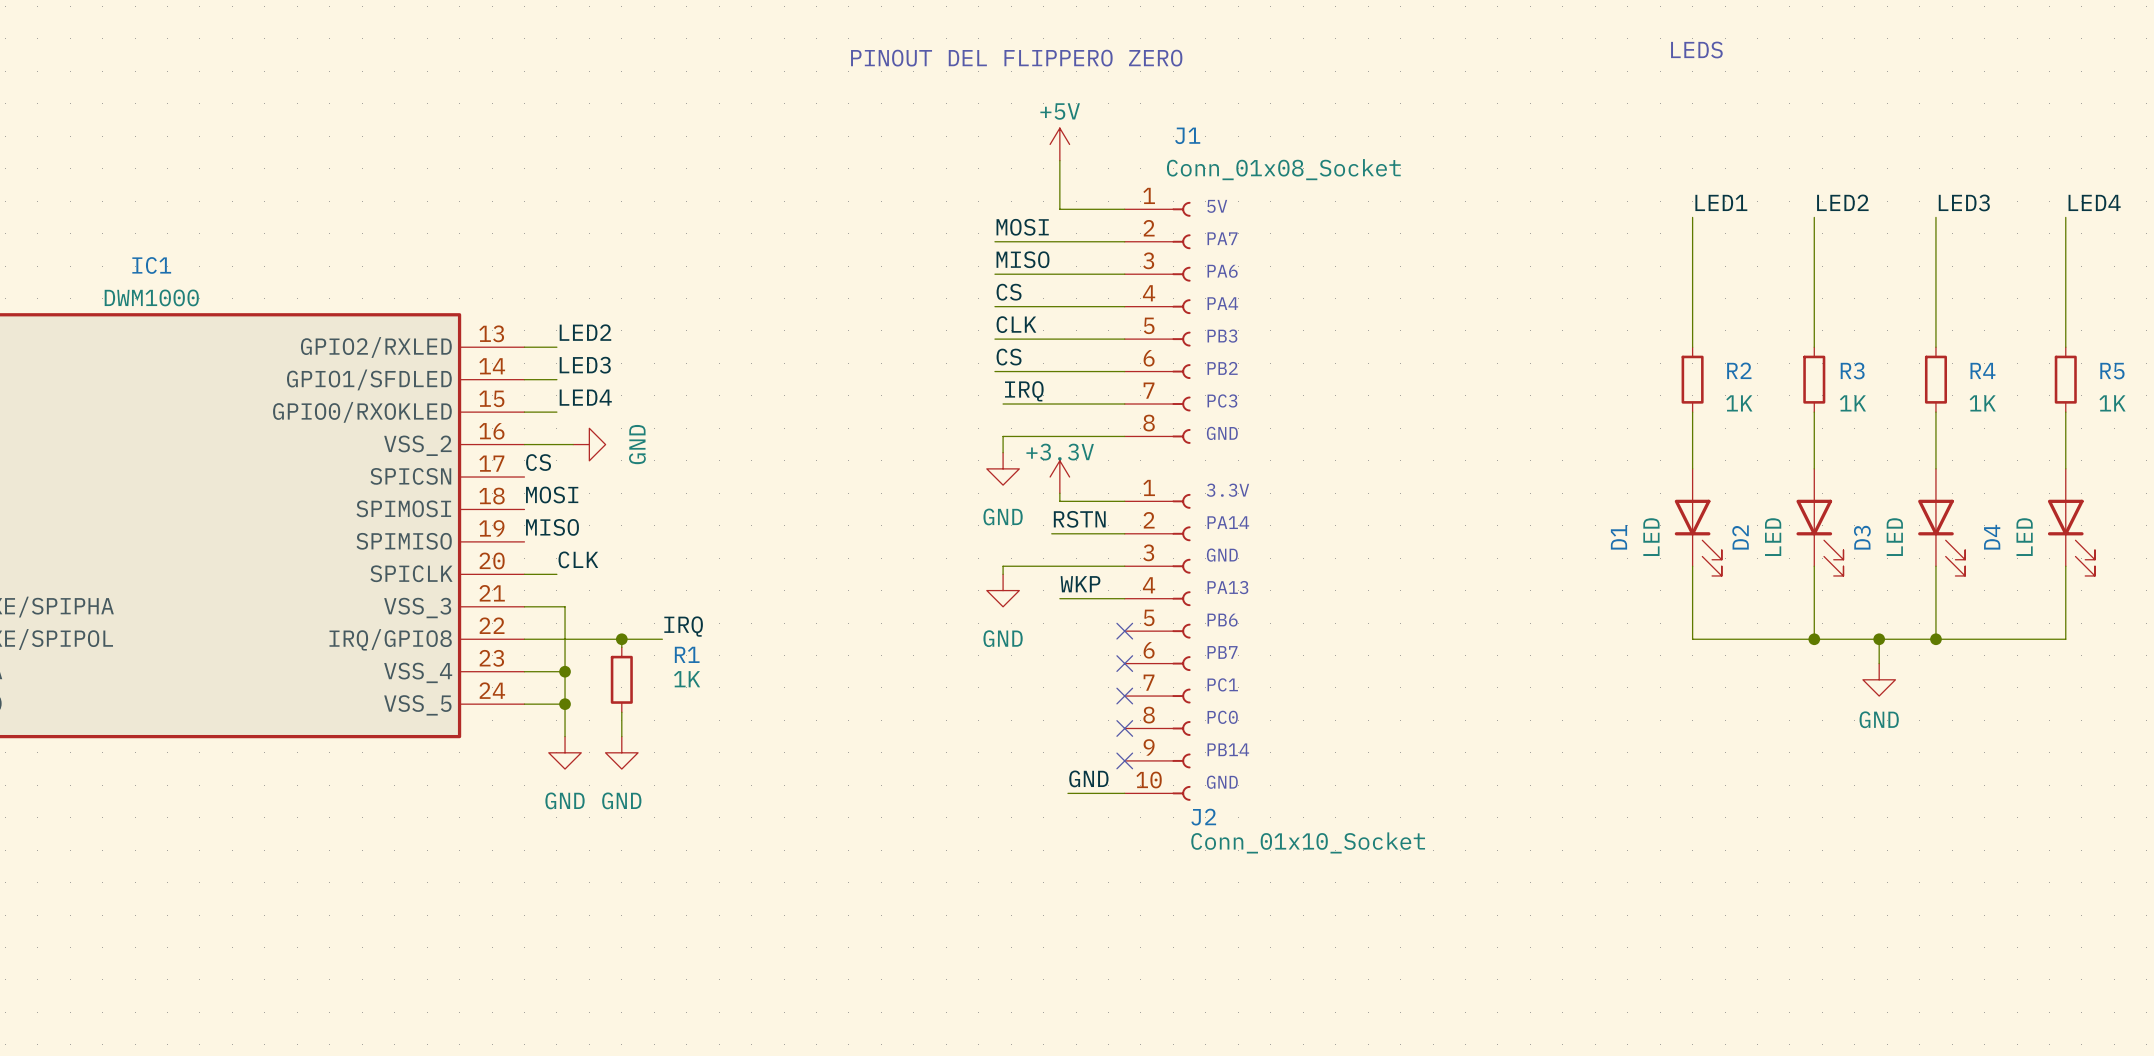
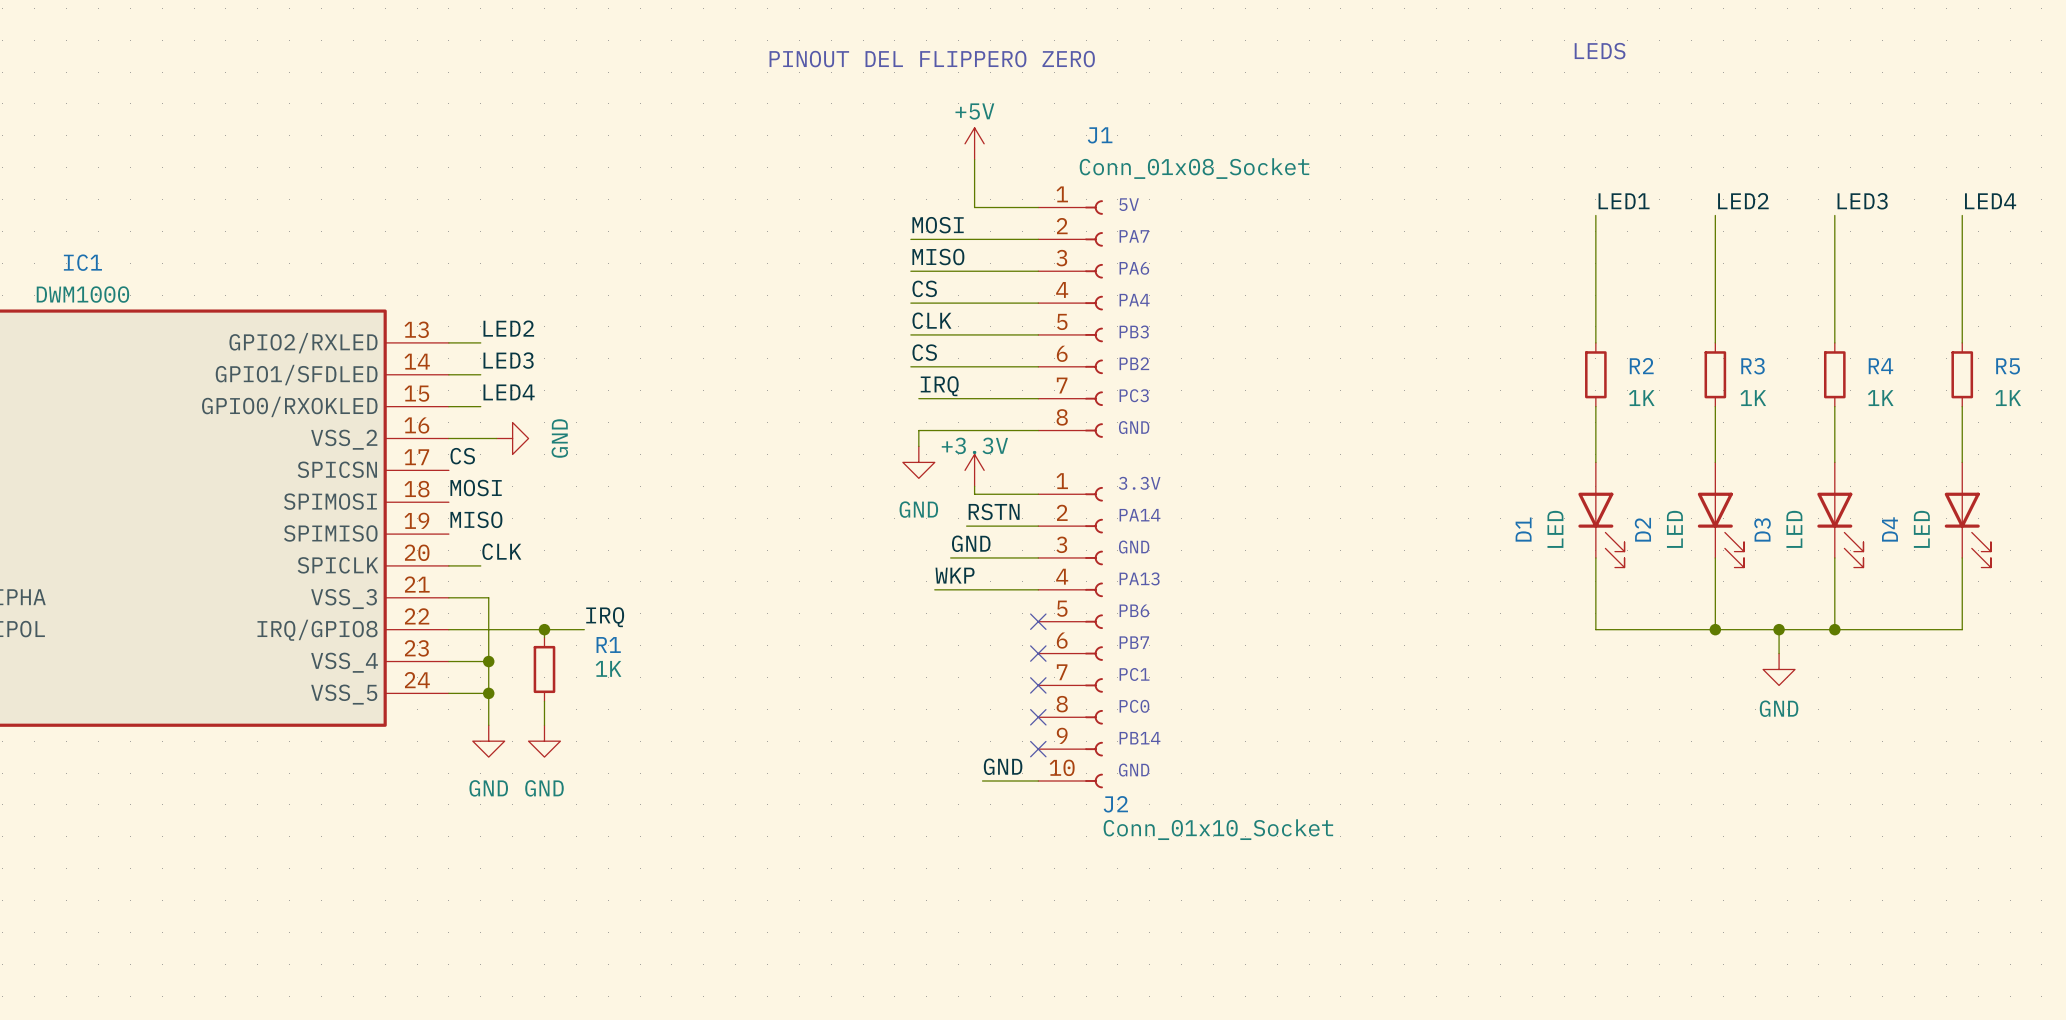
label: none -> GND (971, 543)
wire: (1035, 566) (1003, 566) (1003, 574) -> none
label position: WKP (1080, 584) -> WKP (955, 575)
power symbol: GND (1003, 590) -> none
wire: none -> (934, 589) (974, 589)

